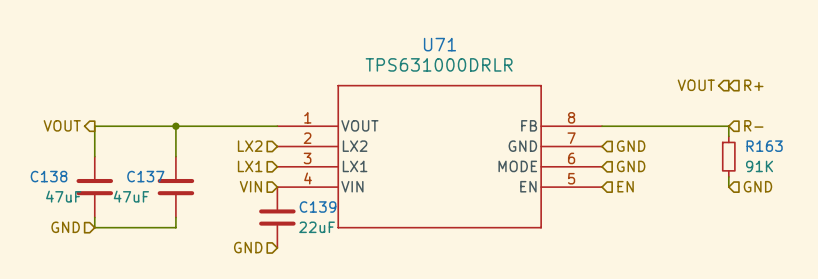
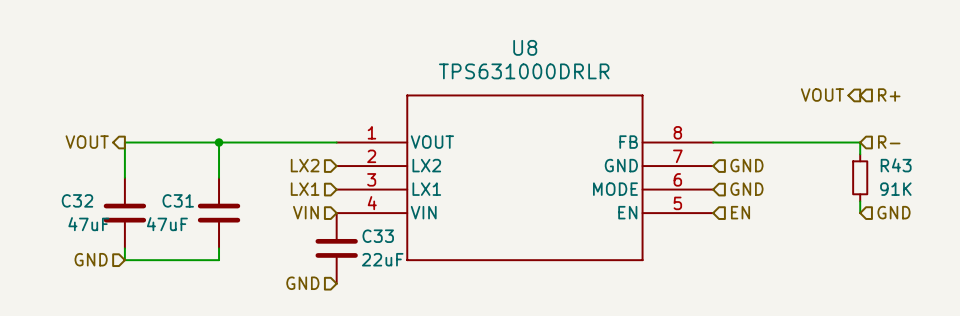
U71 name: U71 (439, 44) -> U8 (525, 47)
R163 name: R163 (764, 146) -> R43 (896, 165)
C138 name: C138 (49, 176) -> C32 (77, 200)
C137 name: C137 (145, 176) -> C31 (178, 200)
C139 name: C139 (318, 207) -> C33 (378, 236)

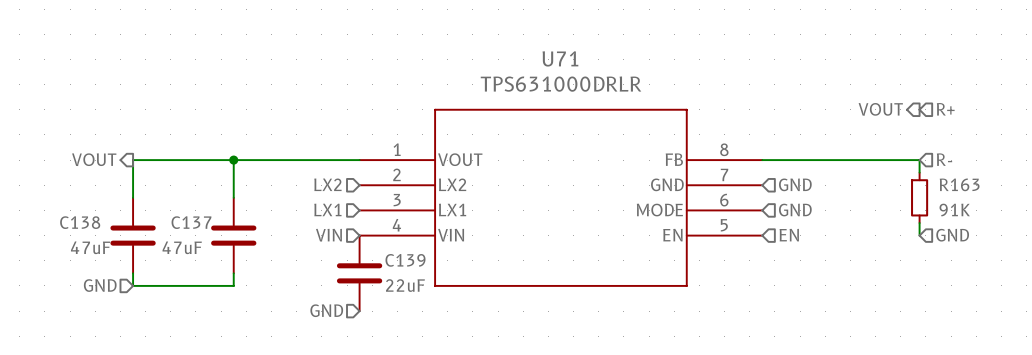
U8 name: U8 (525, 47) -> U71 (560, 58)
R43 name: R43 (896, 165) -> R163 (959, 184)
C32 name: C32 (77, 200) -> C138 (80, 222)
C31 name: C31 (178, 200) -> C137 (191, 222)
C33 name: C33 (378, 236) -> C139 (405, 260)

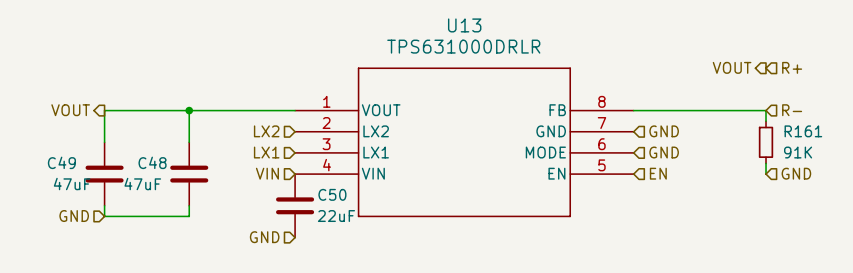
U71 name: U71 (560, 58) -> U13 (464, 25)
R163 name: R163 (959, 184) -> R161 (803, 131)
C138 name: C138 (80, 222) -> C49 (61, 162)
C137 name: C137 (191, 222) -> C48 (152, 162)
C139 name: C139 (405, 260) -> C50 (332, 194)

